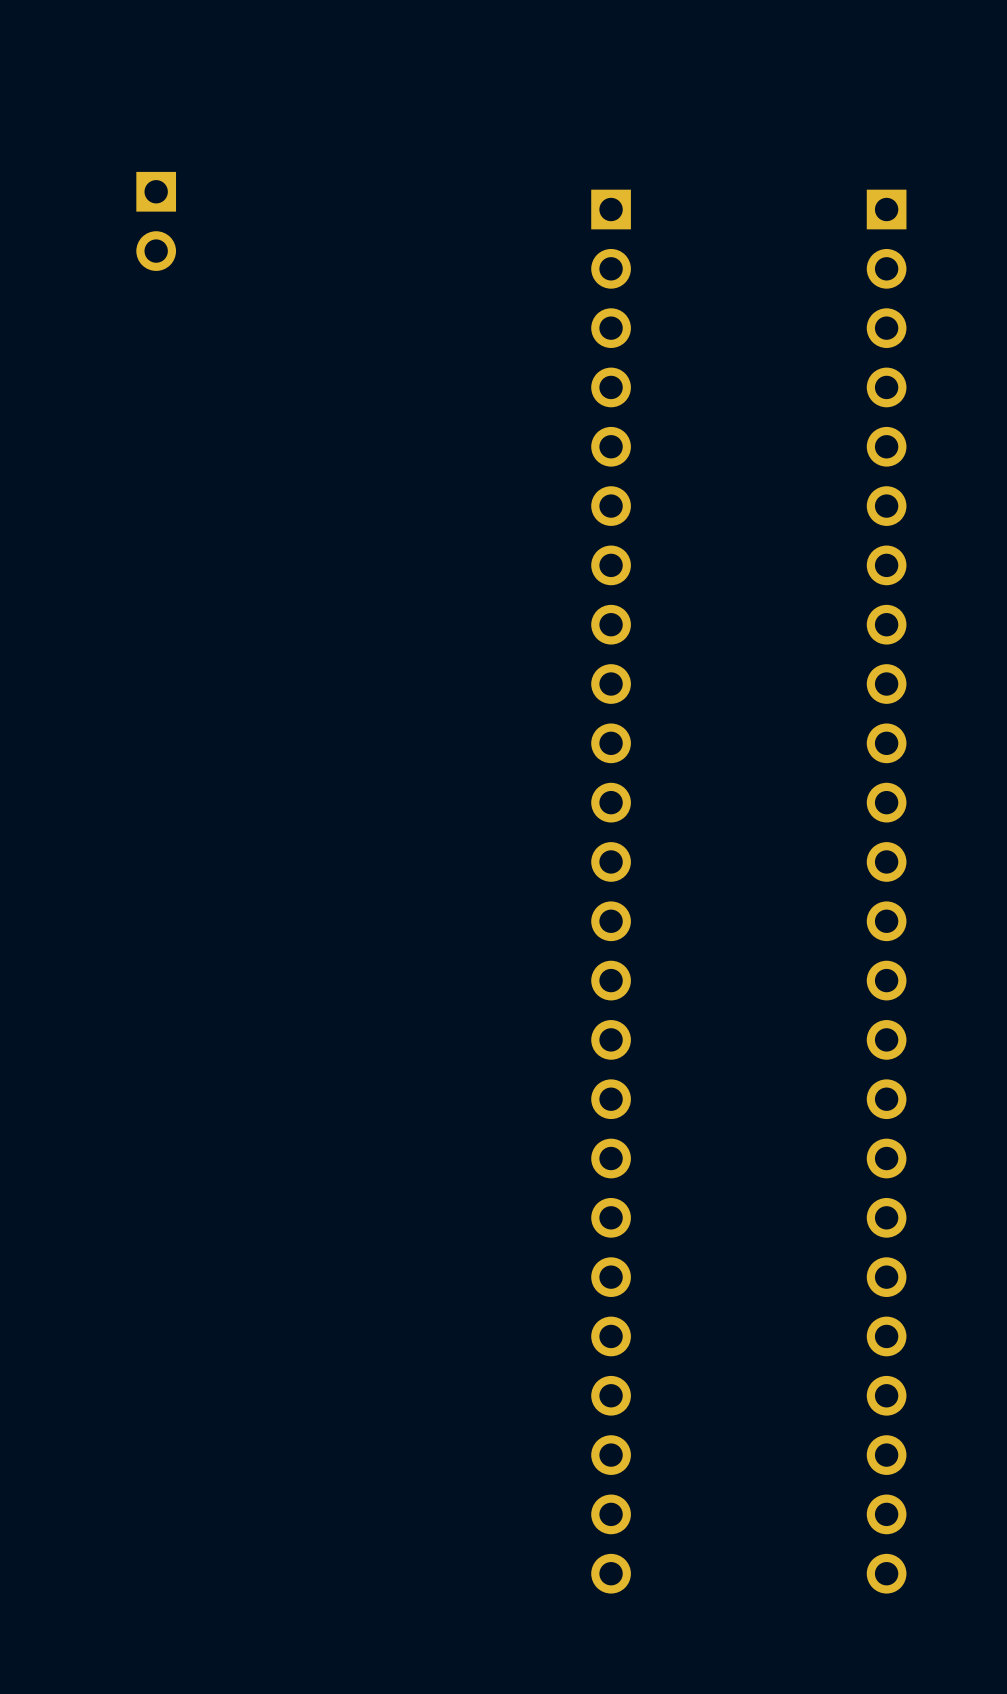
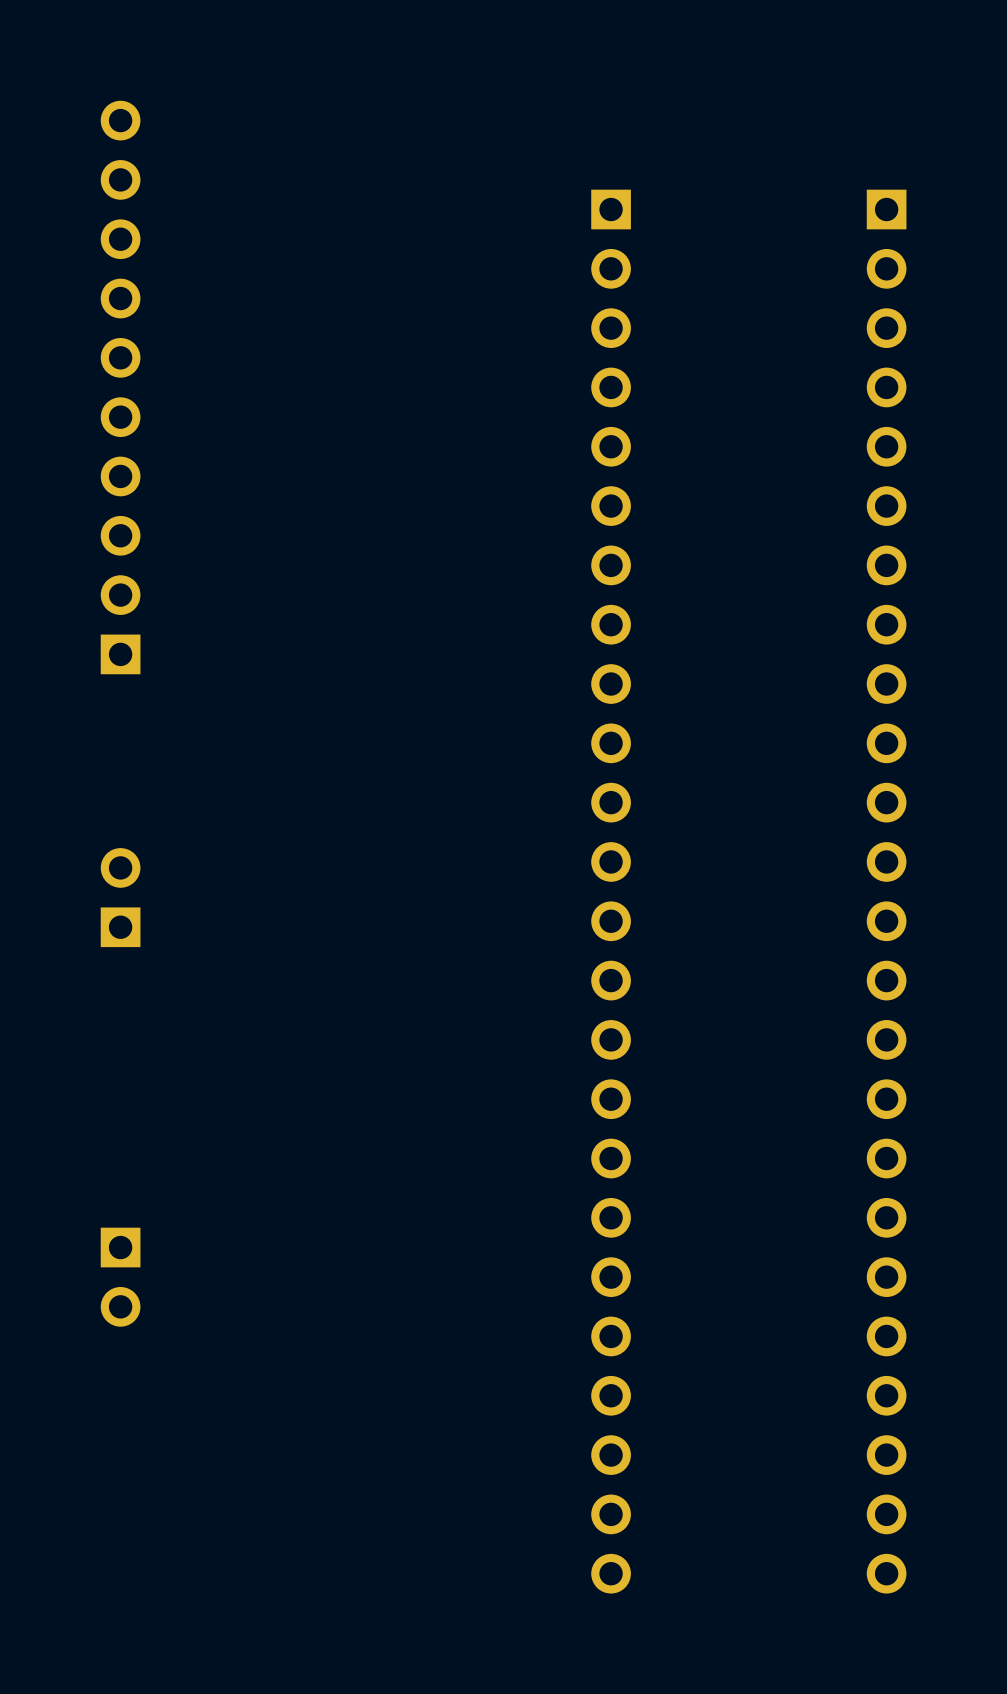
part: (156, 221) -> none
part: none -> (120, 387)
part: none -> (120, 897)
part: none -> (120, 1277)

